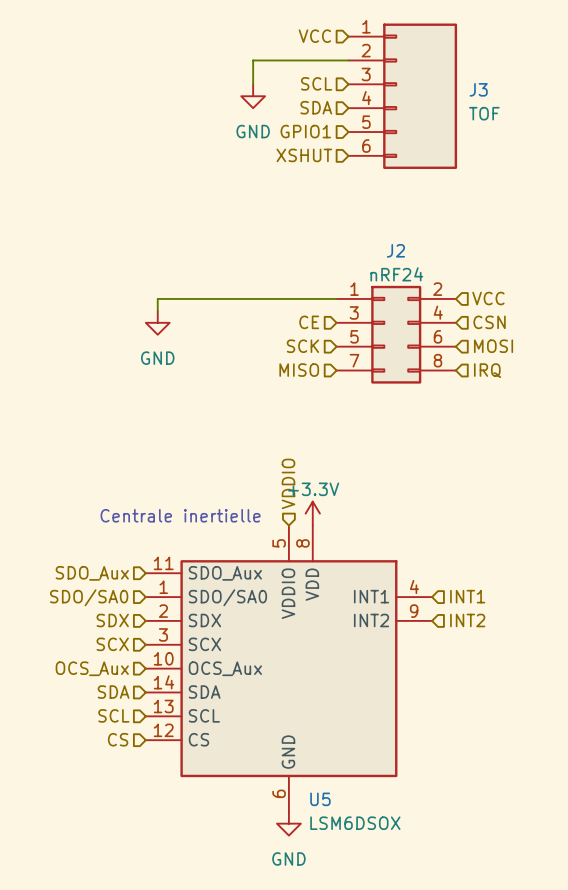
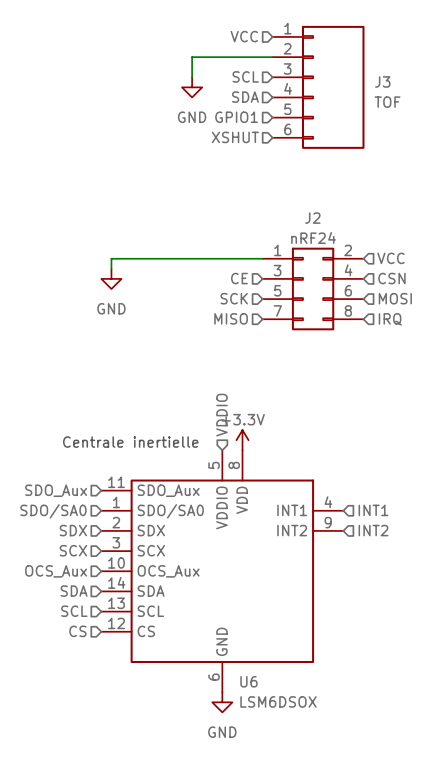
U5 name: U5 (320, 799) -> U6 (248, 681)

